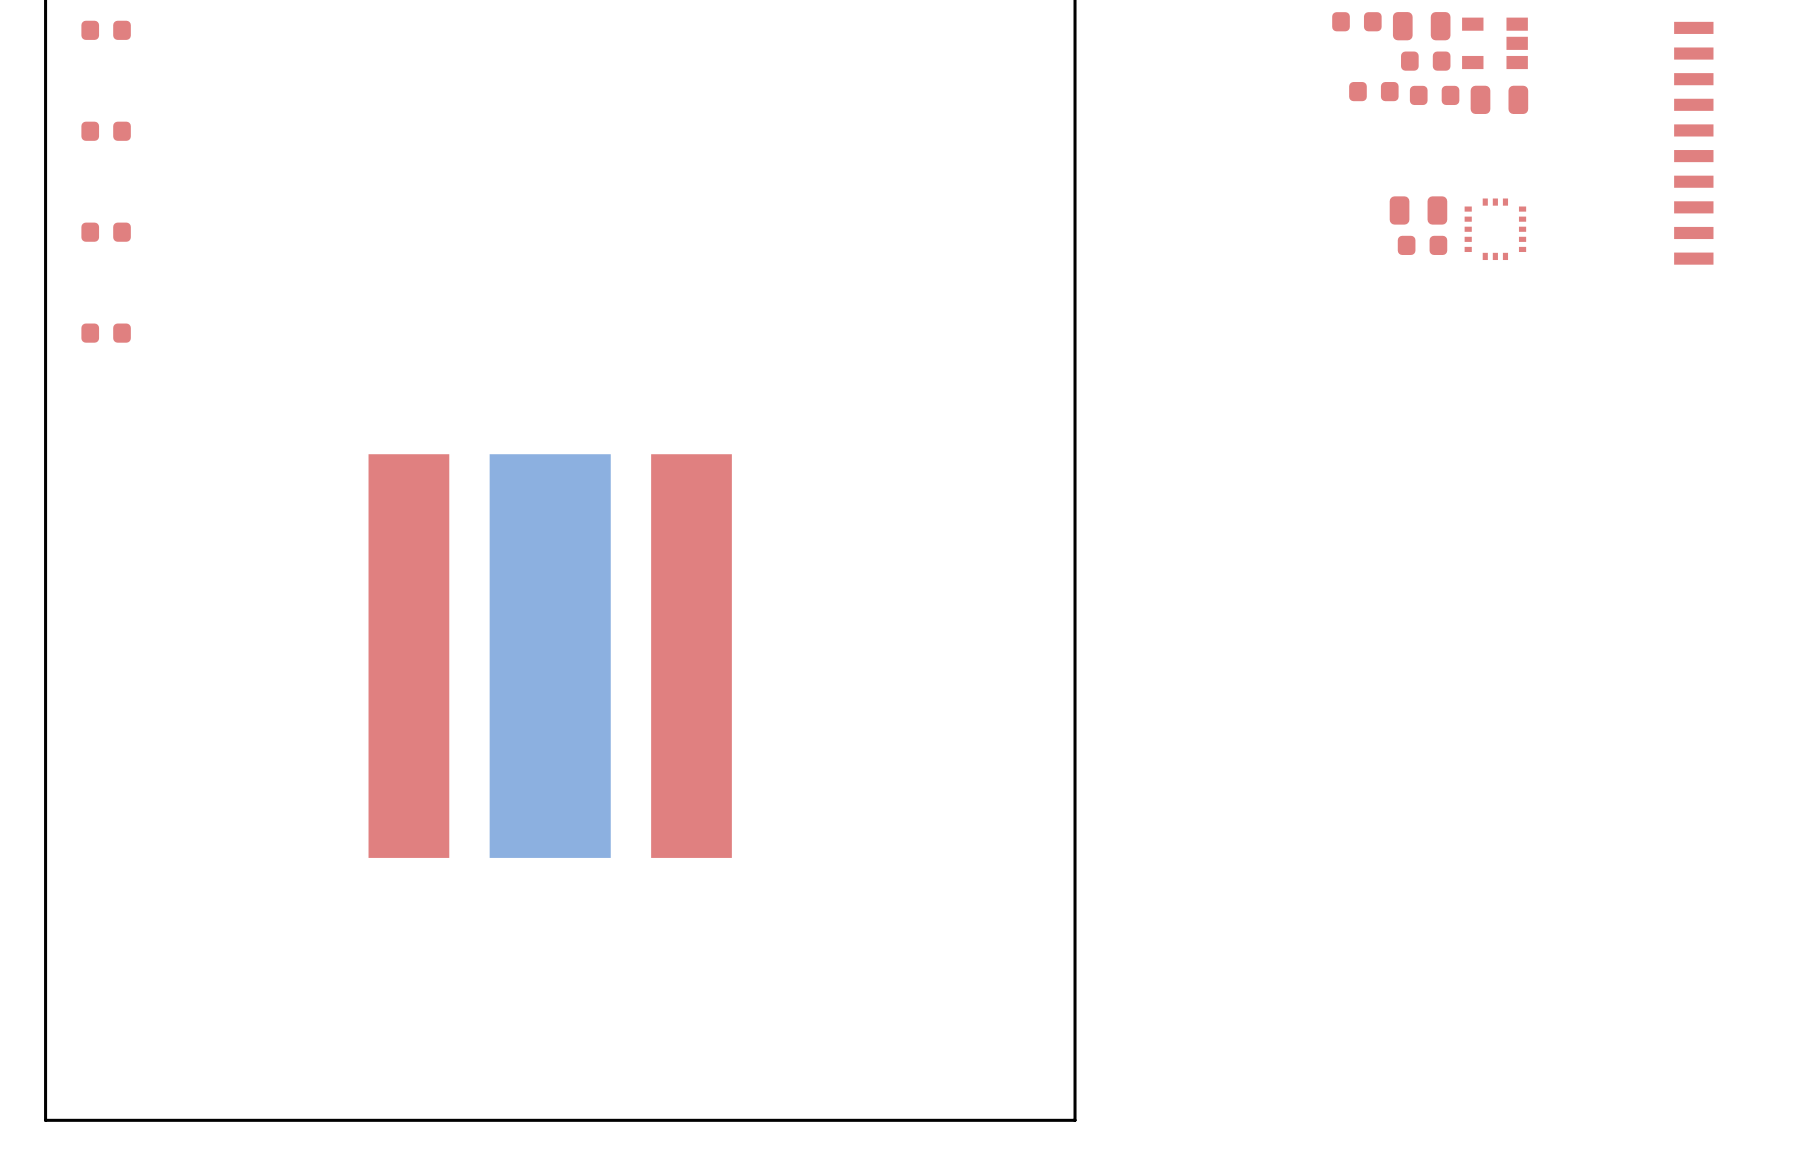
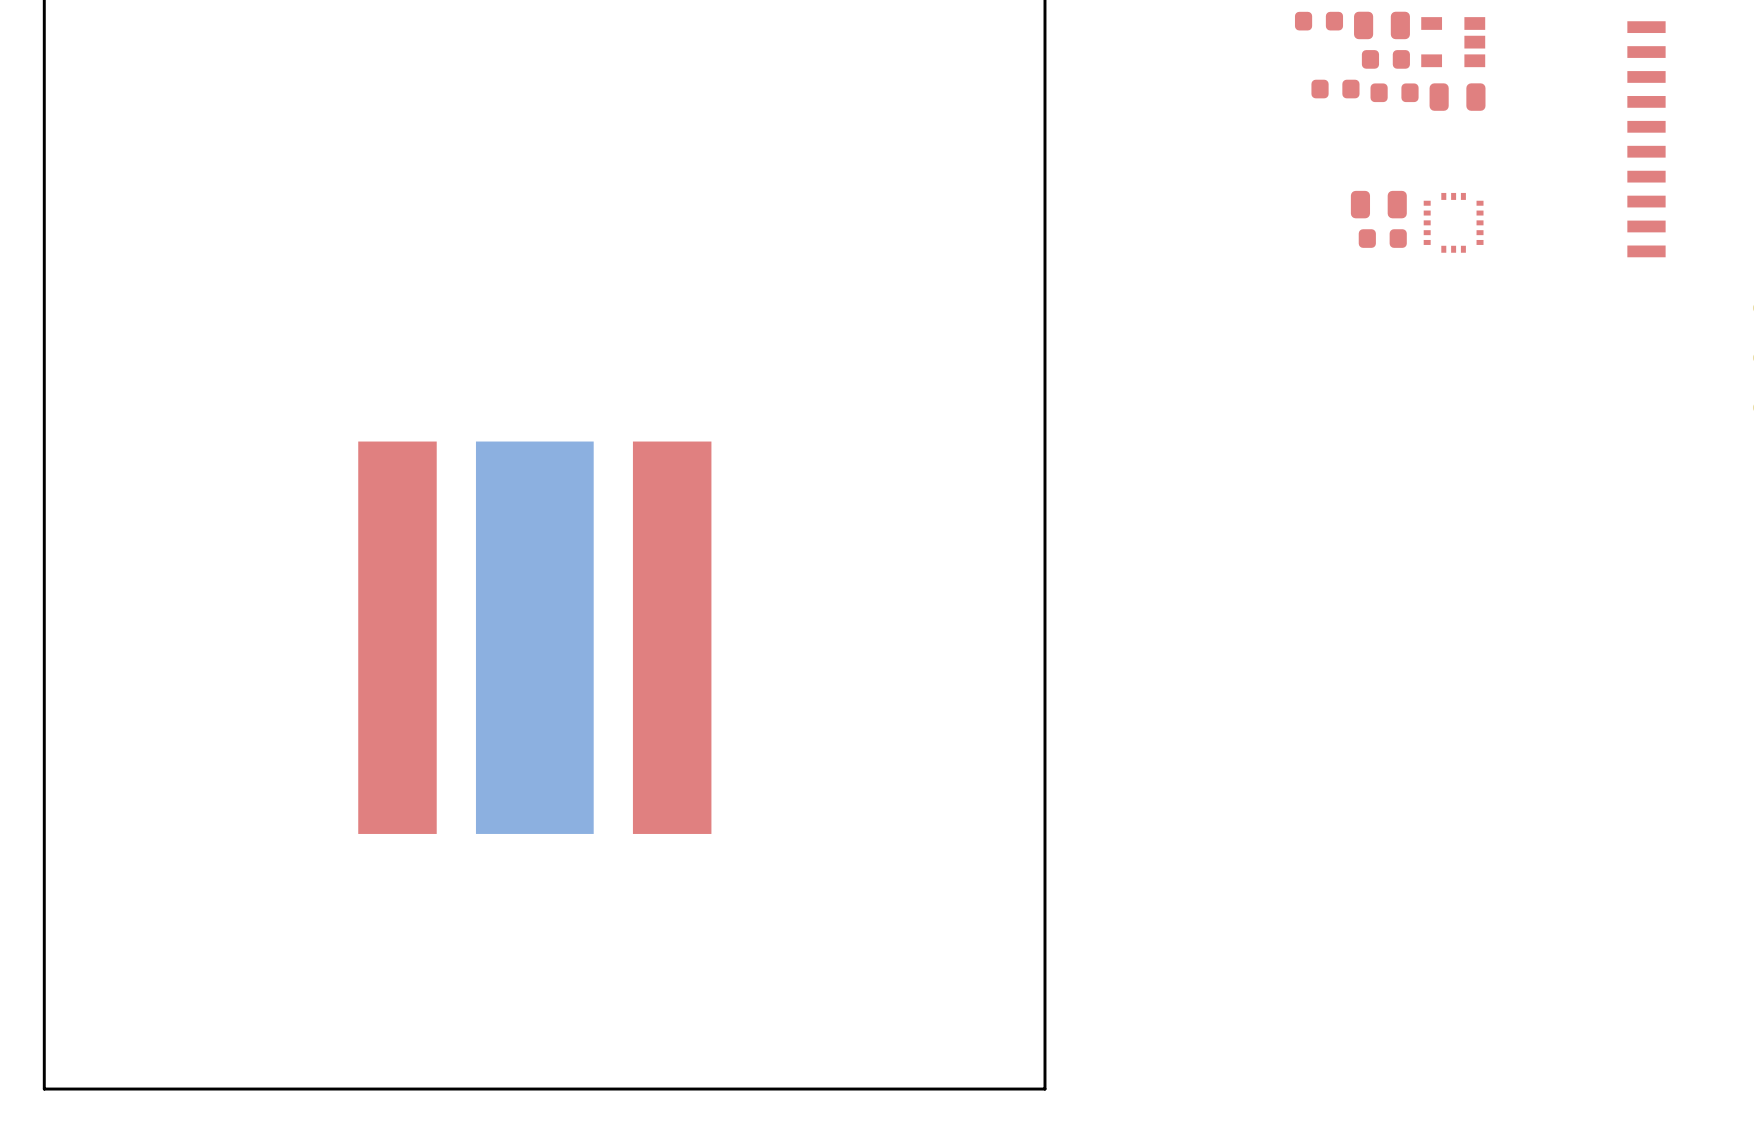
part: (106, 30) -> none
part: (106, 131) -> none
part: (106, 232) -> none
part: (106, 333) -> none

